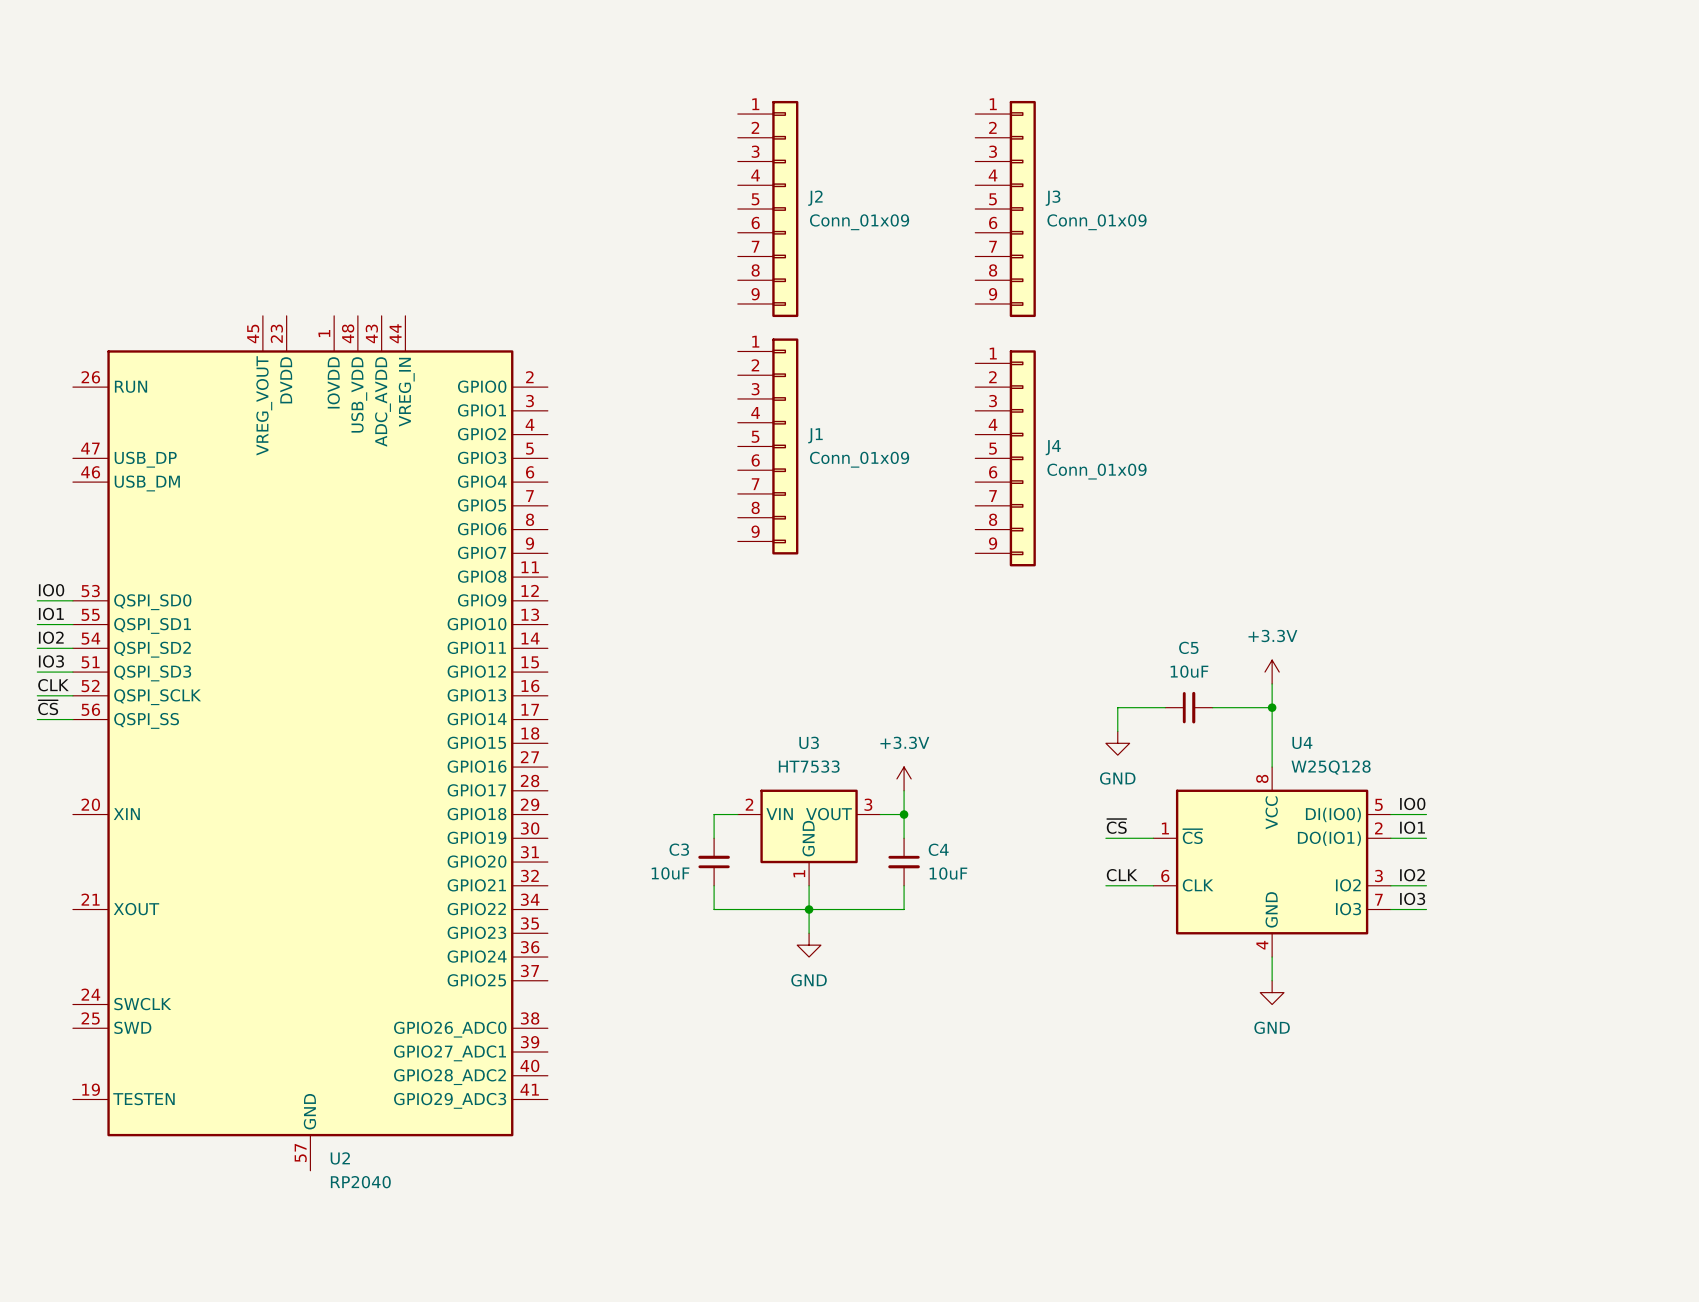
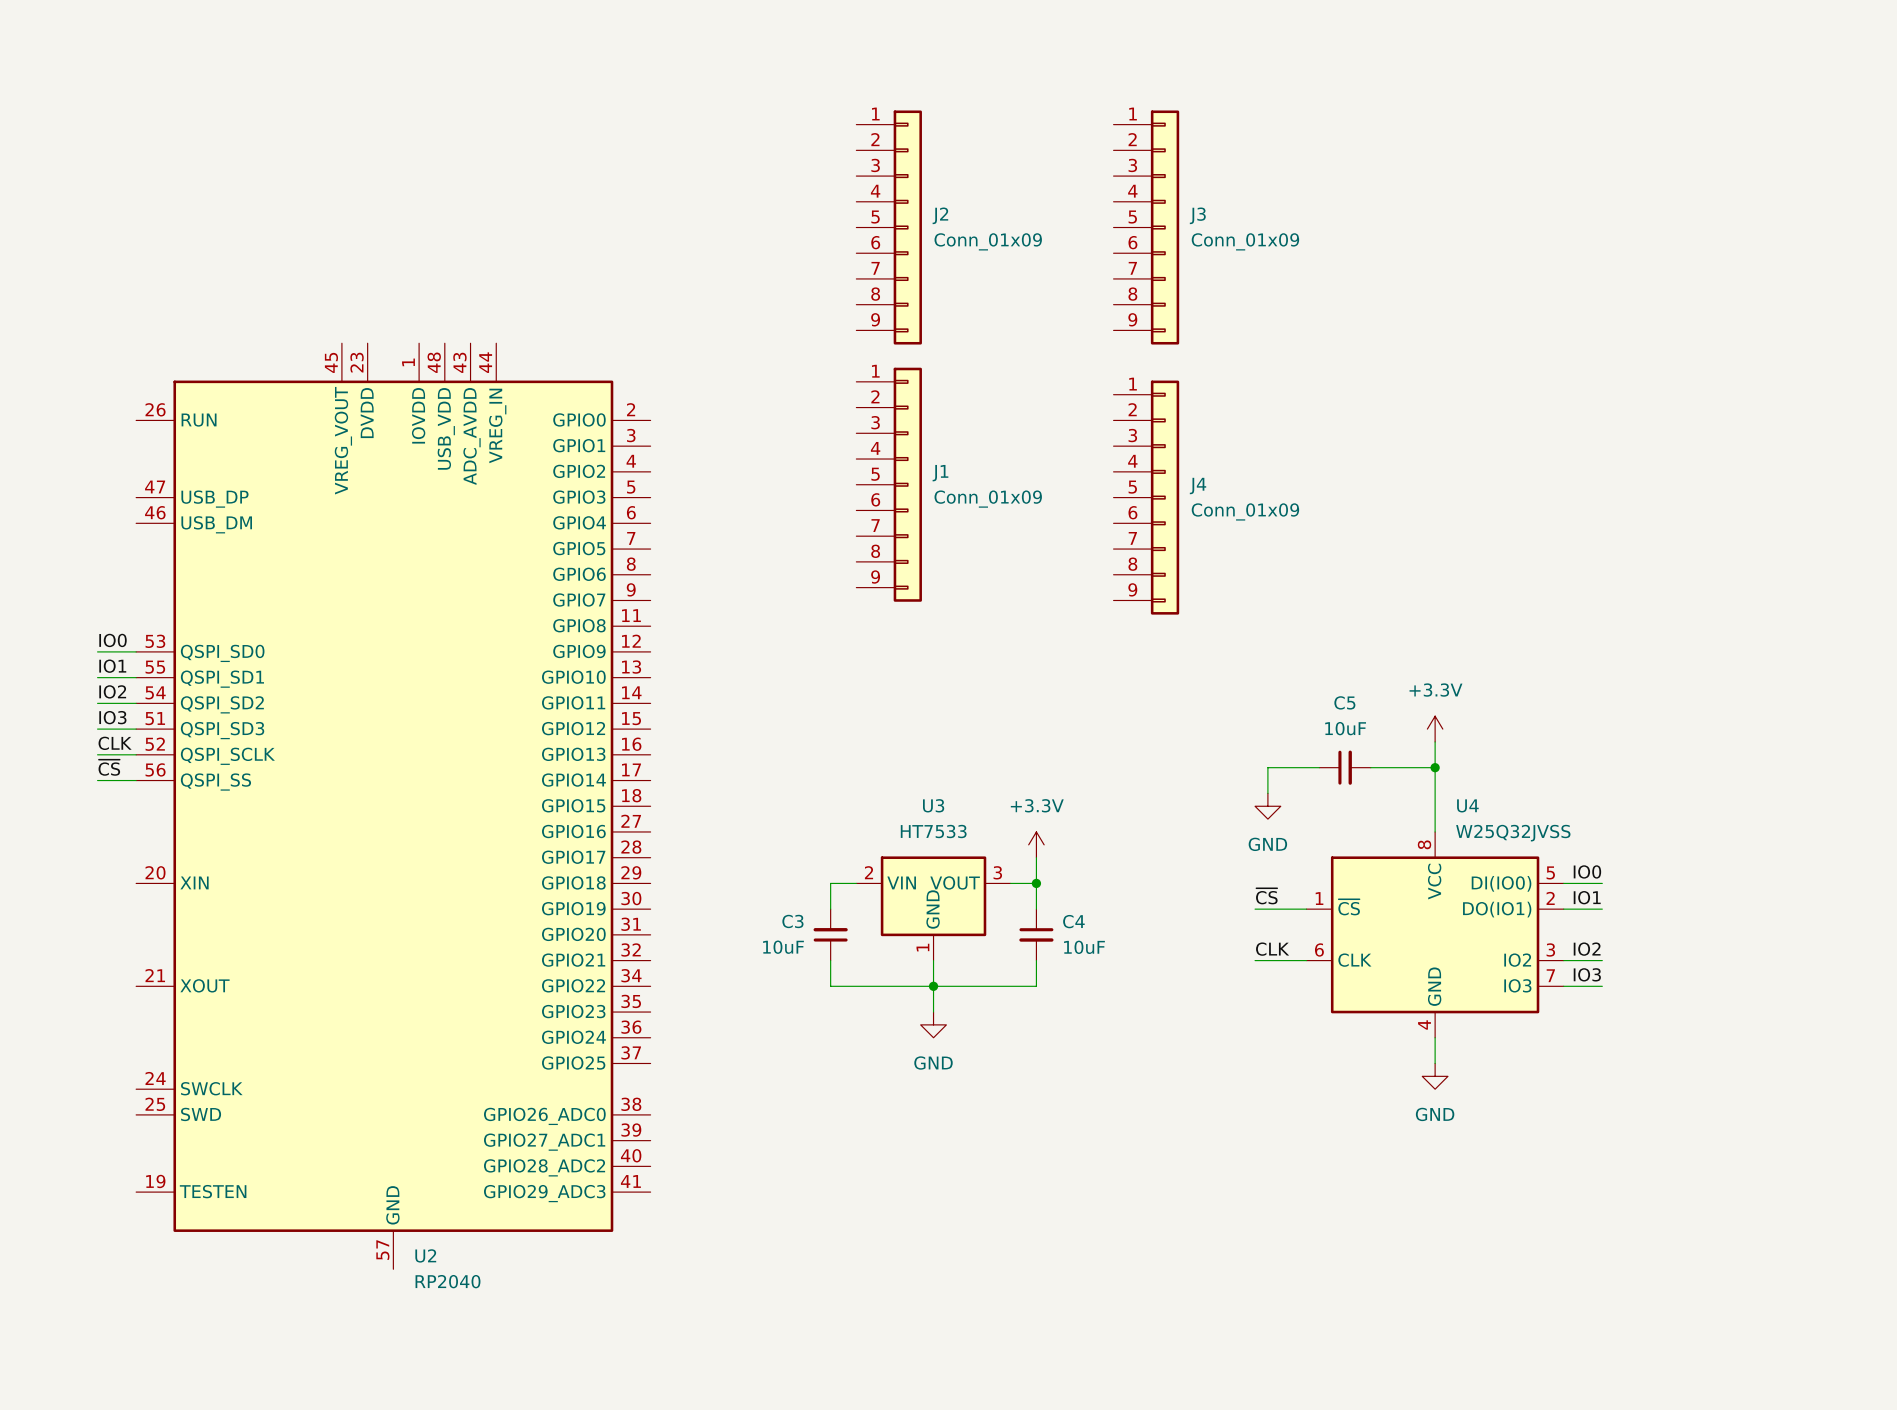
U4 value: W25Q128 (1331, 767) -> W25Q32JVSS (1513, 833)

